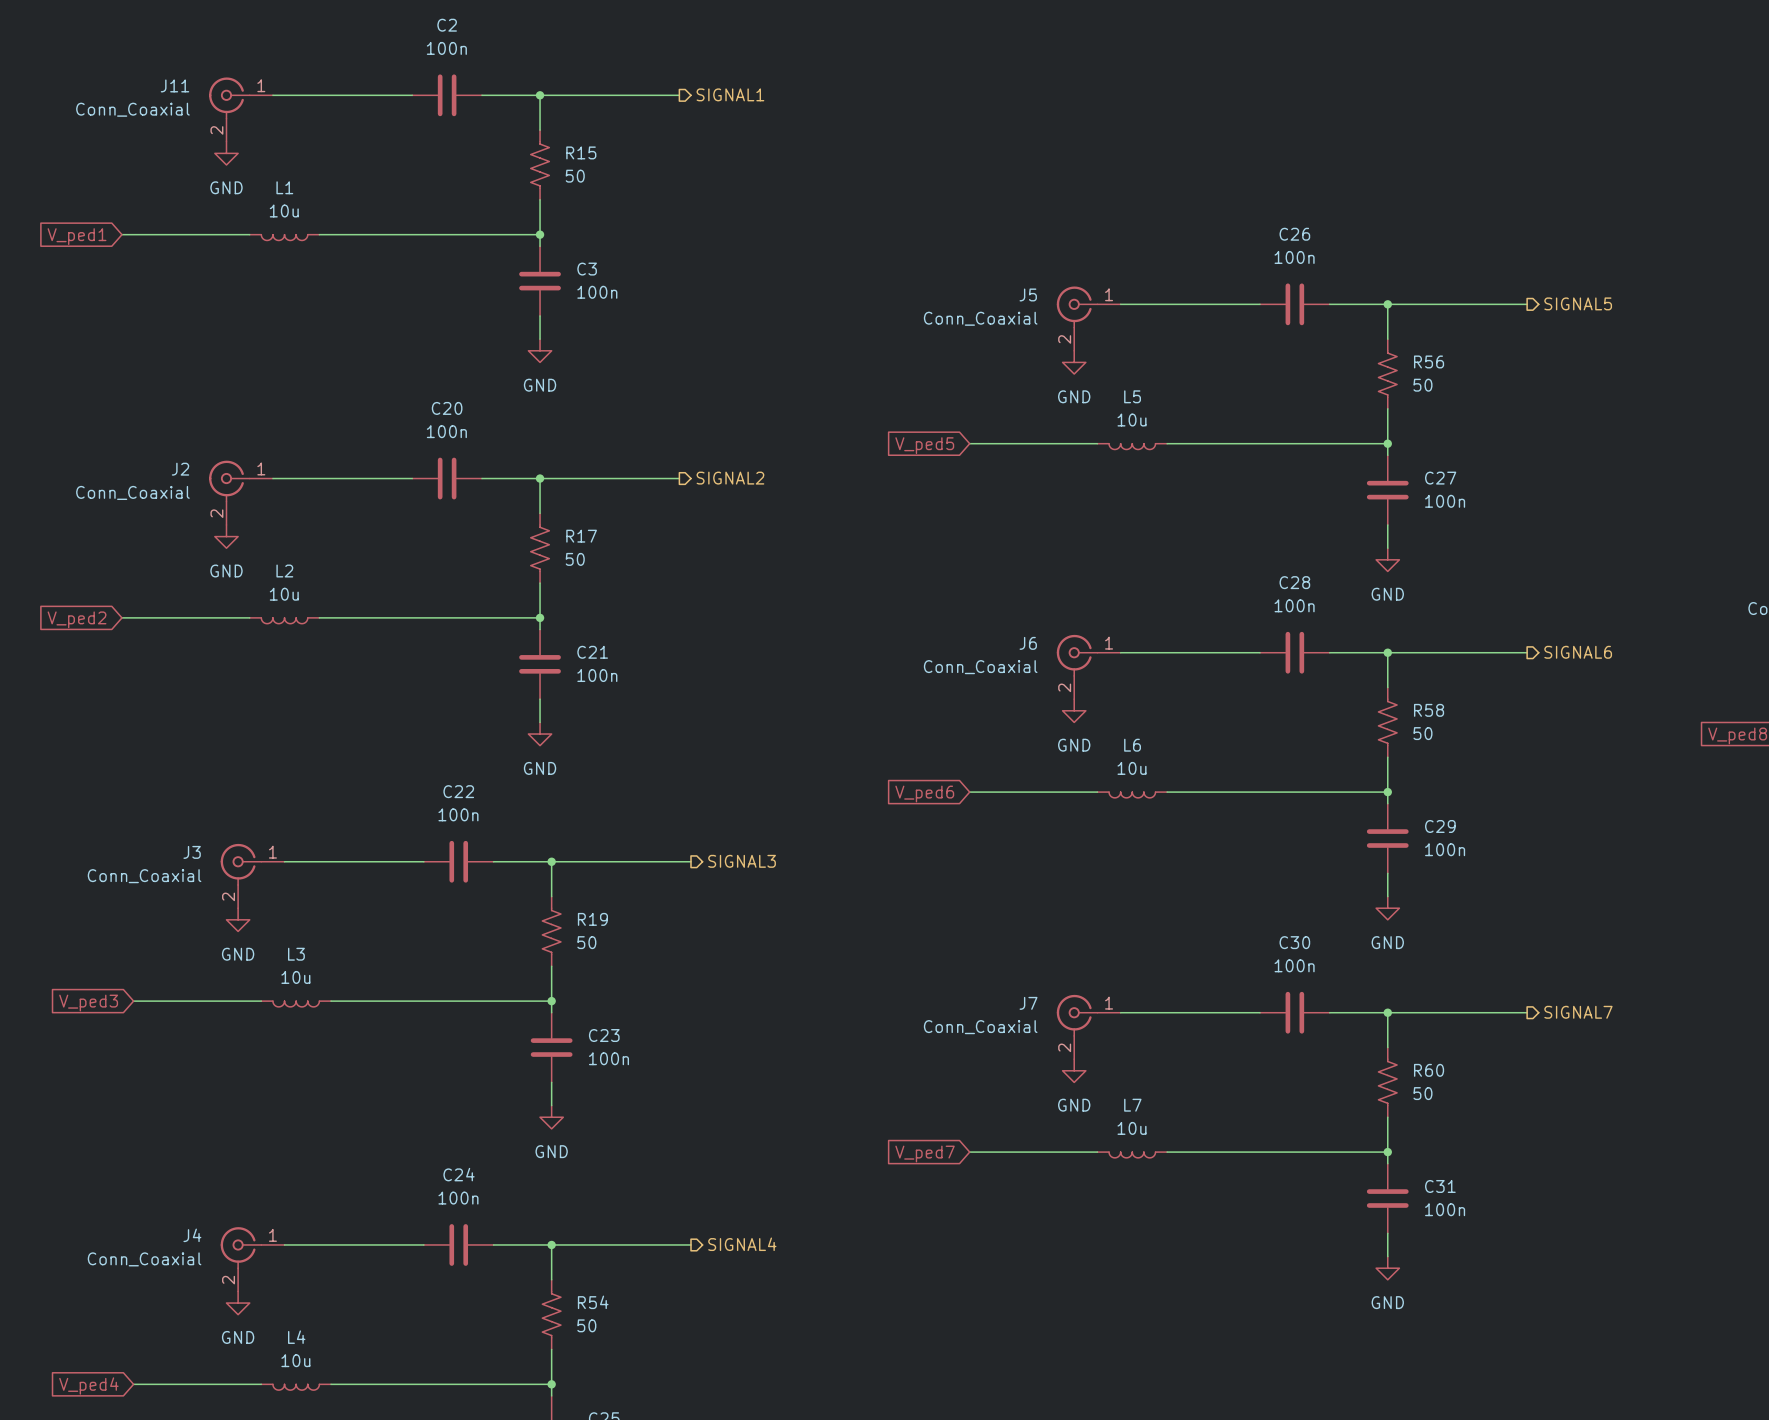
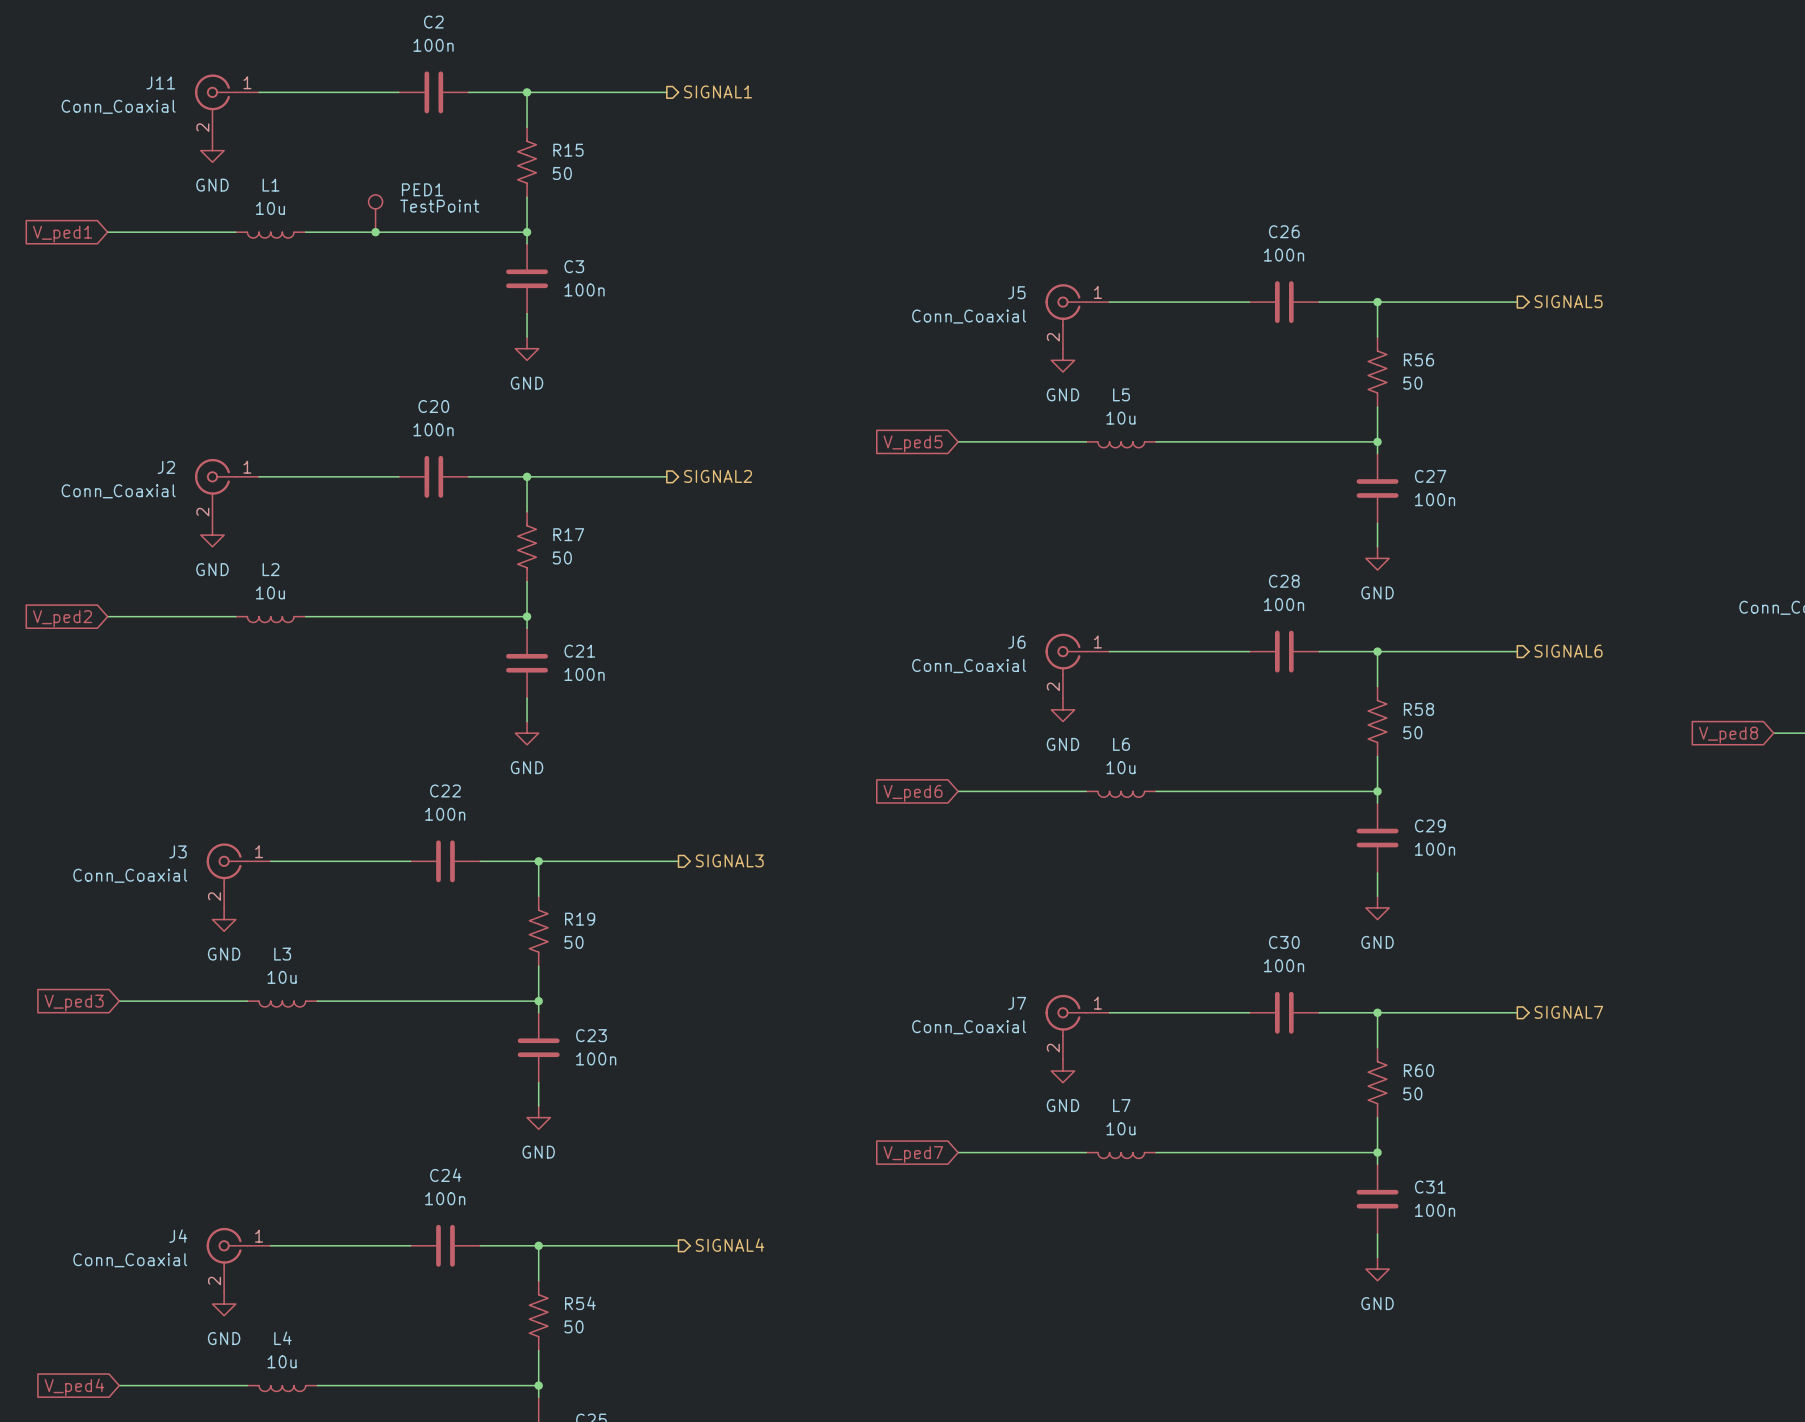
PED1: none -> TestPoint (375, 213)
junction: none -> (375, 232)

